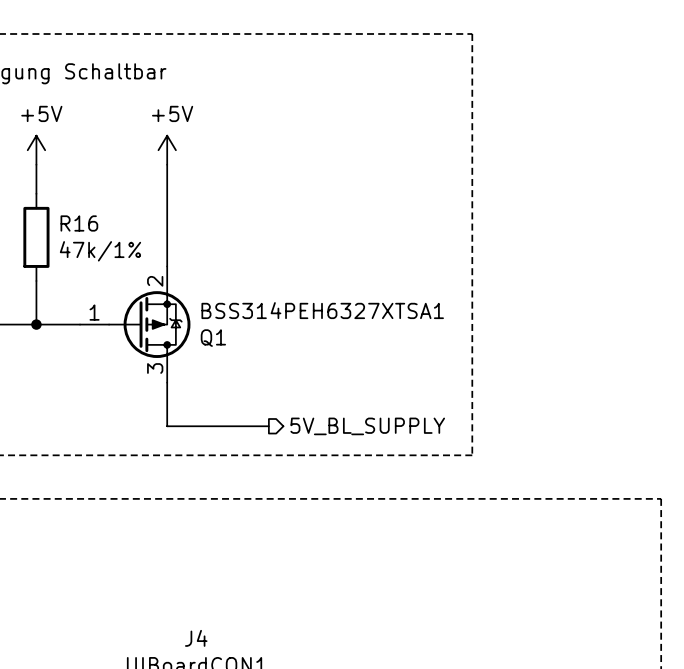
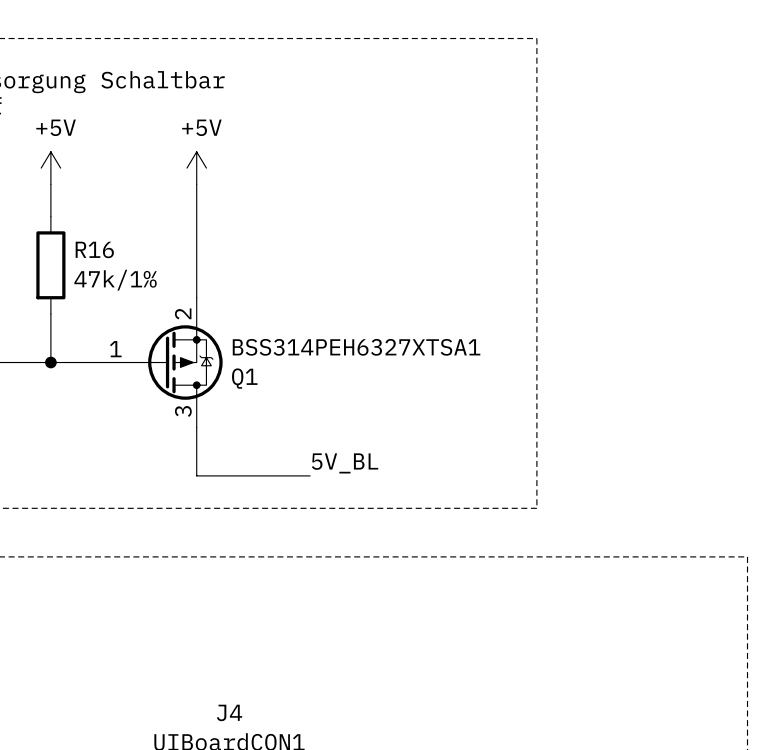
label: none -> 5V_BL (345, 463)
hierarchical label: 5V_BL_SUPPLY (367, 426) -> none

